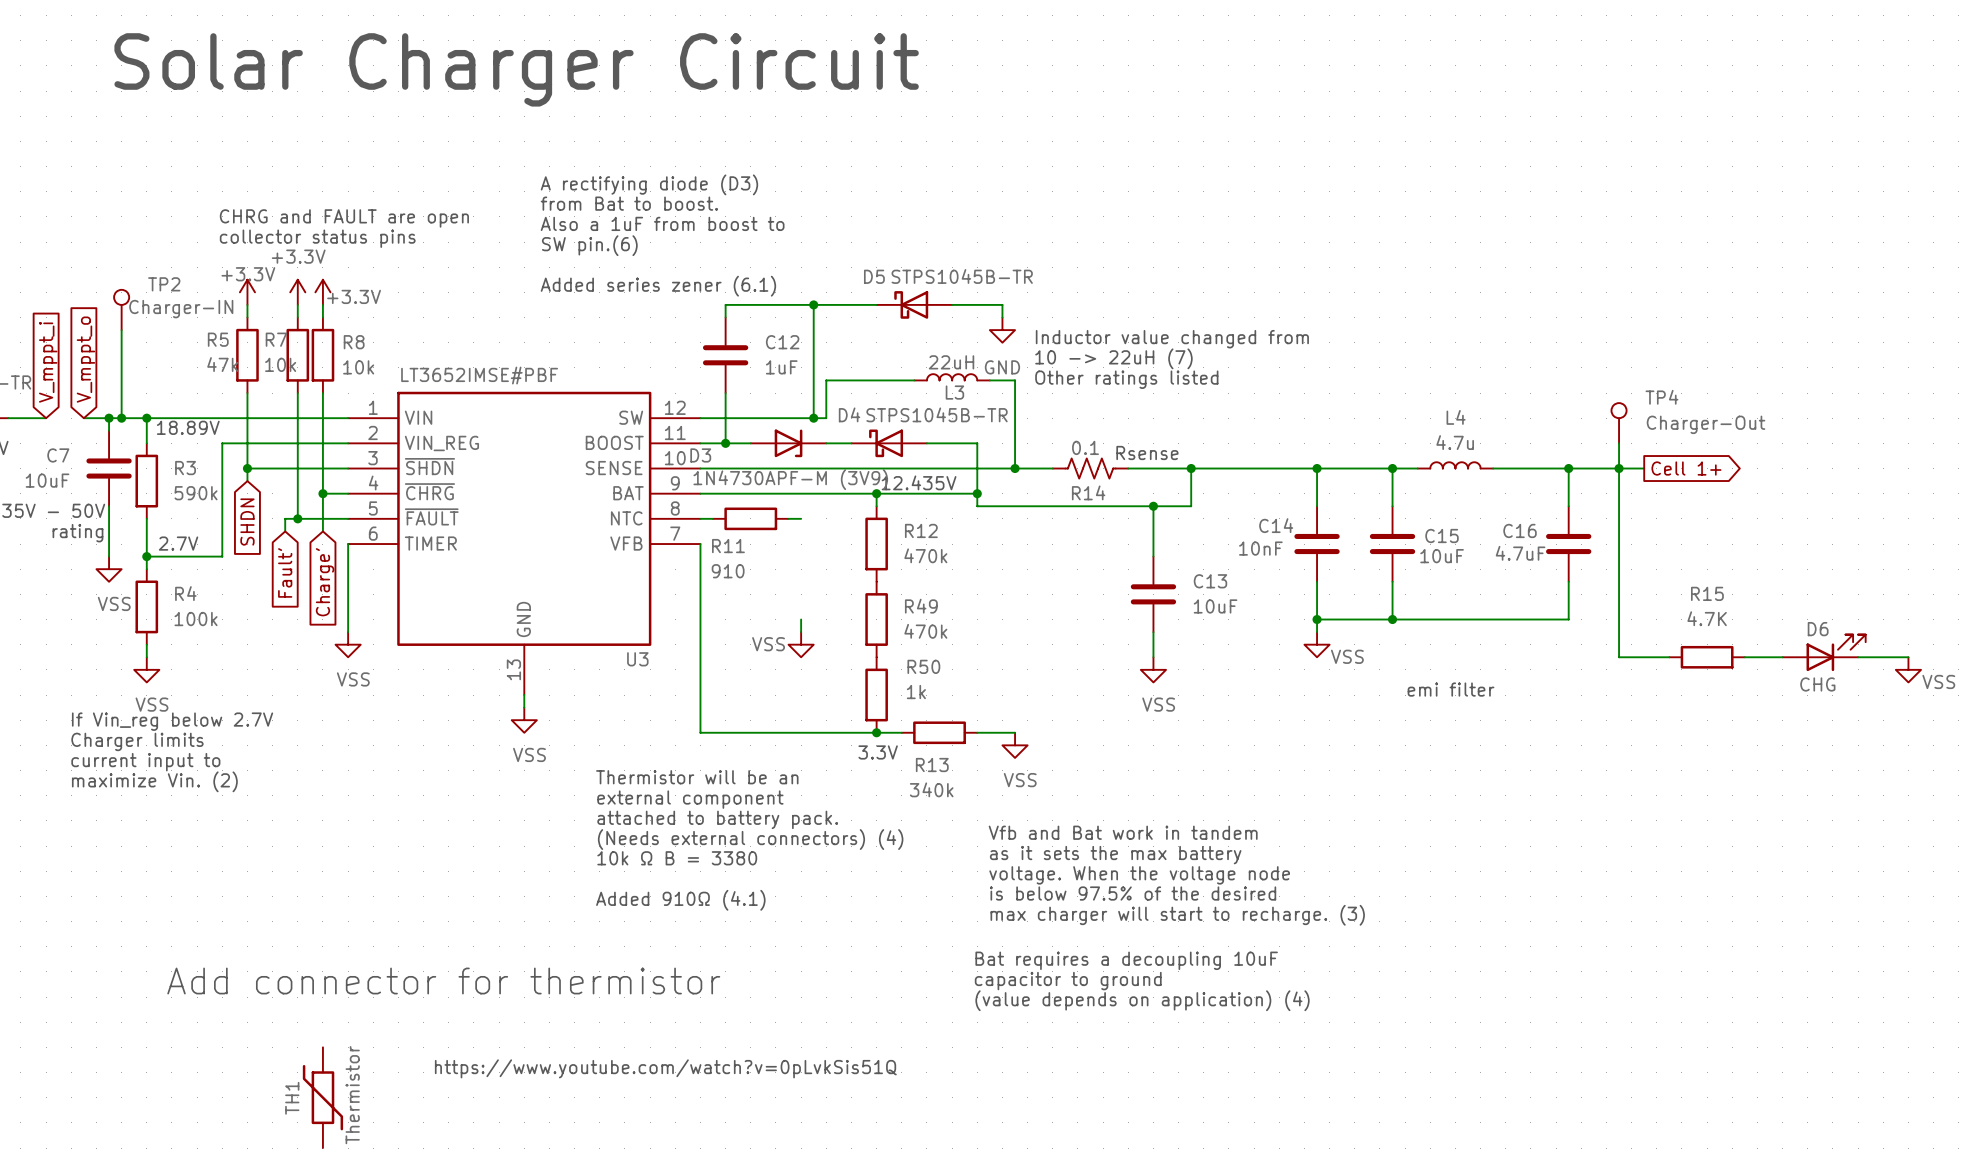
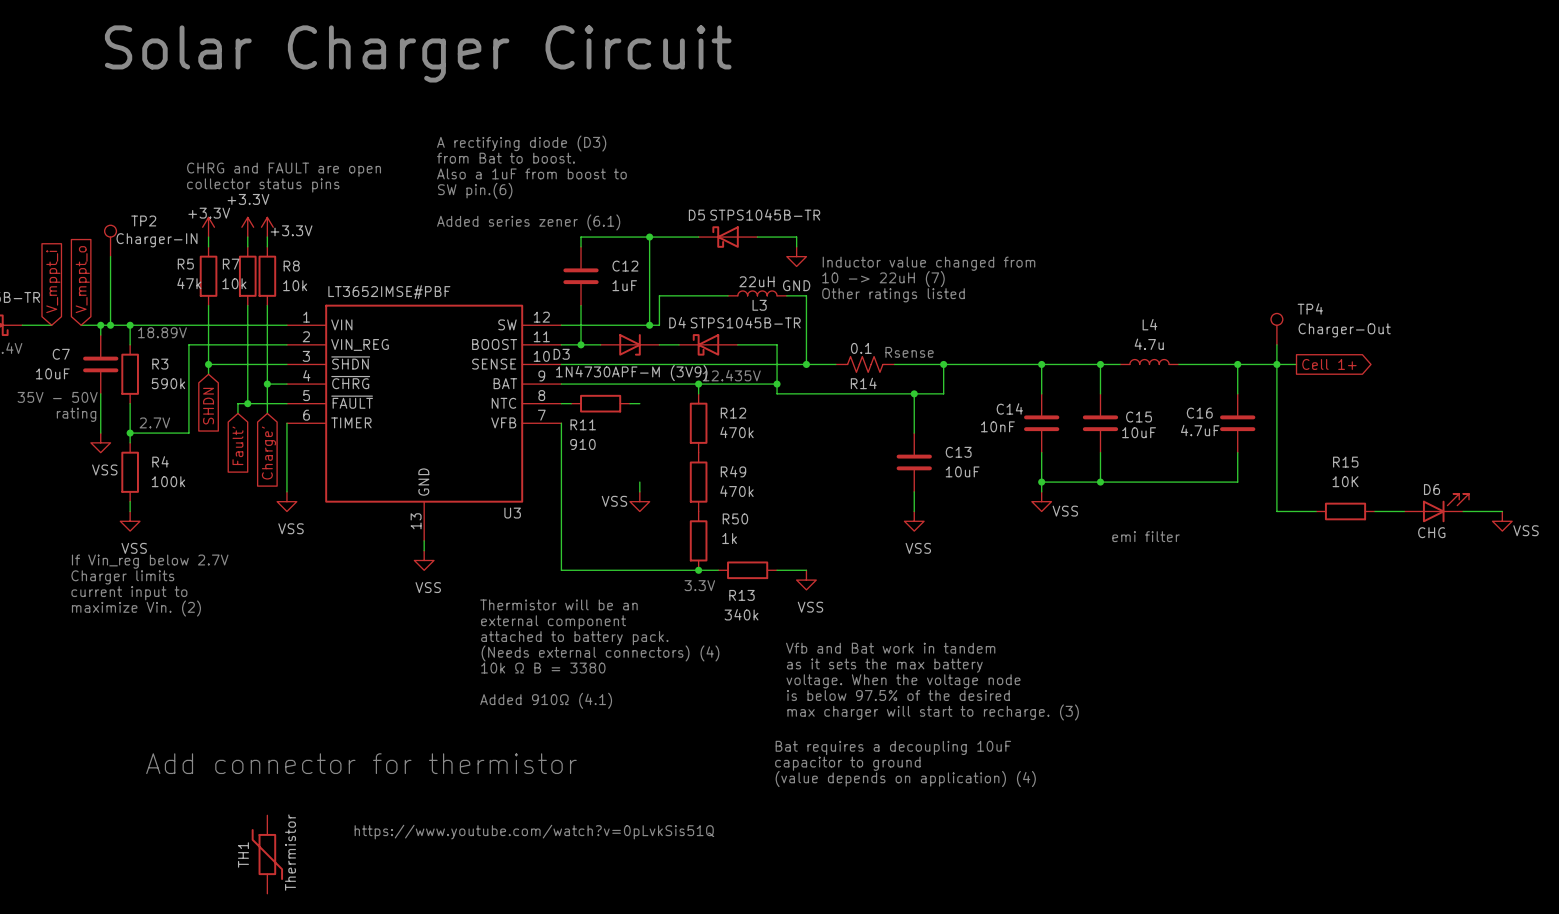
R15 value: 4.7K (1707, 618) -> 10K (1345, 481)

